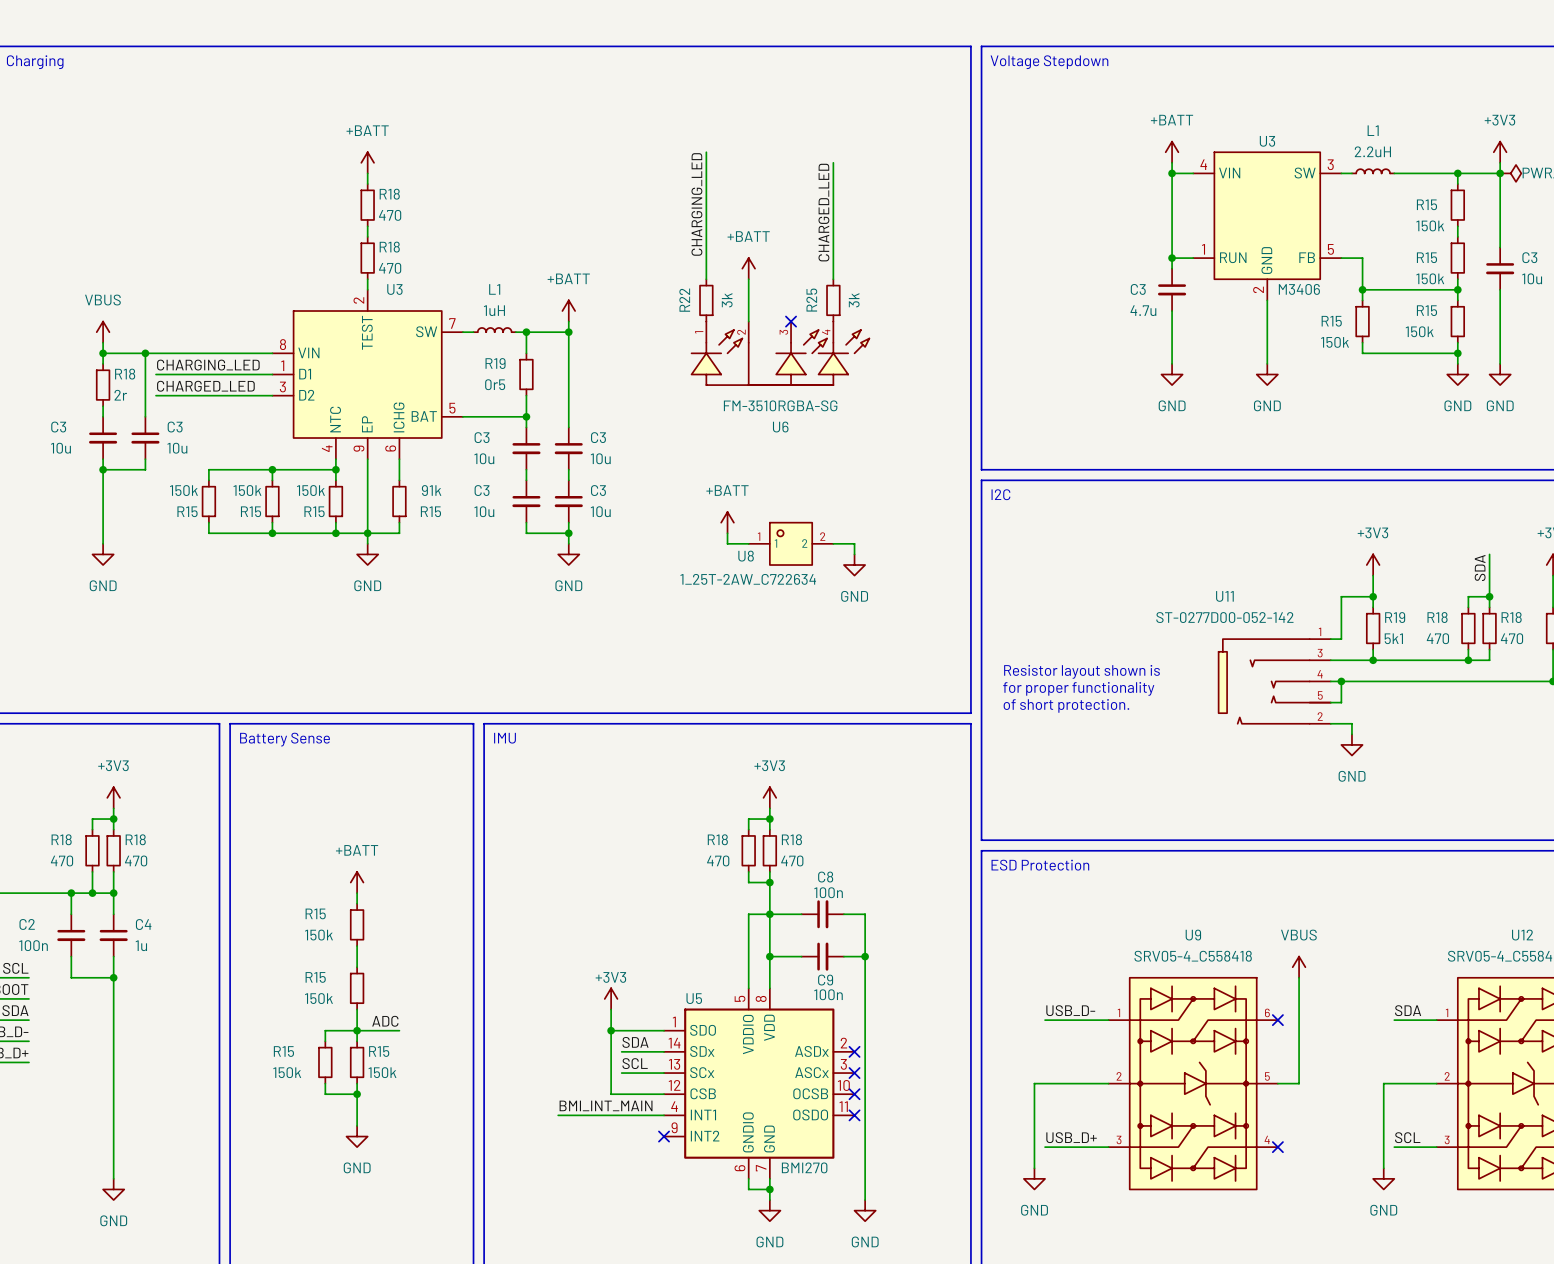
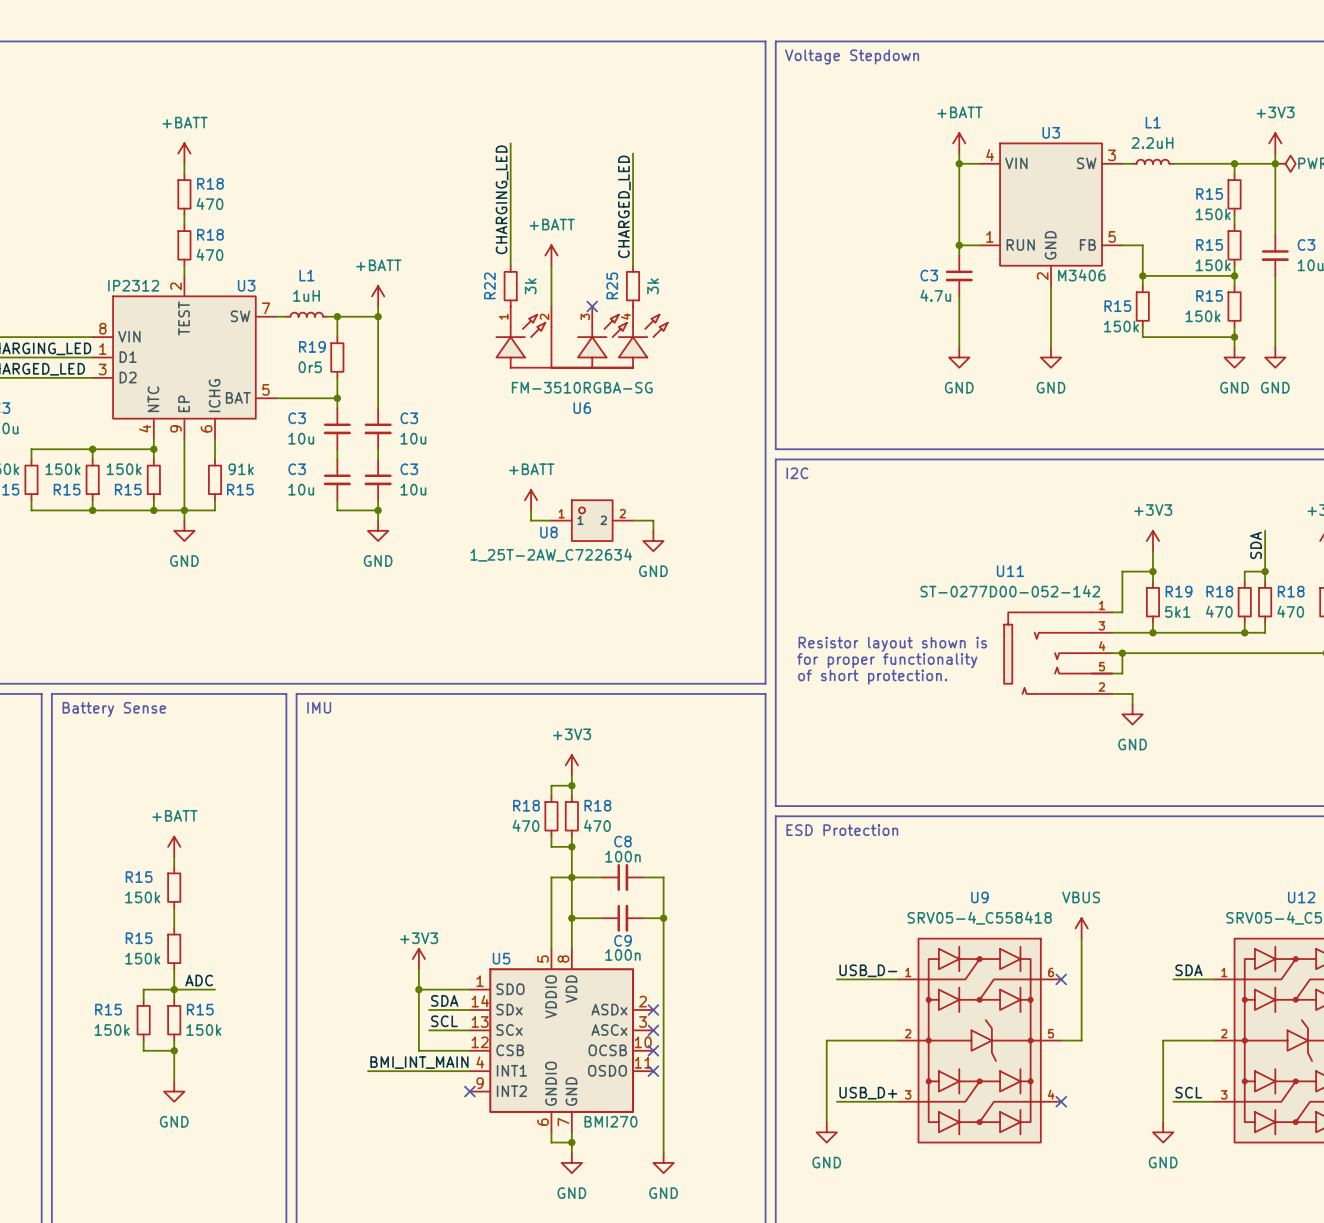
U3 name position: U3 (394, 289) -> U3 (246, 285)
U3 value: none -> IP2312 (133, 285)

